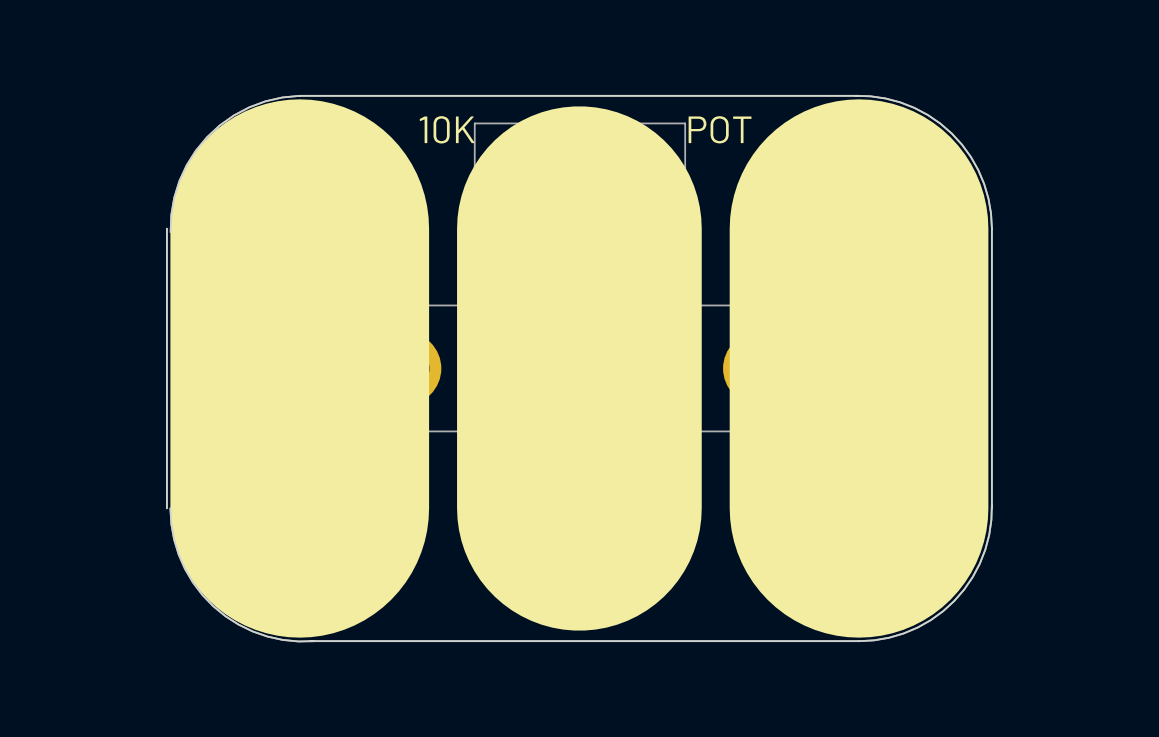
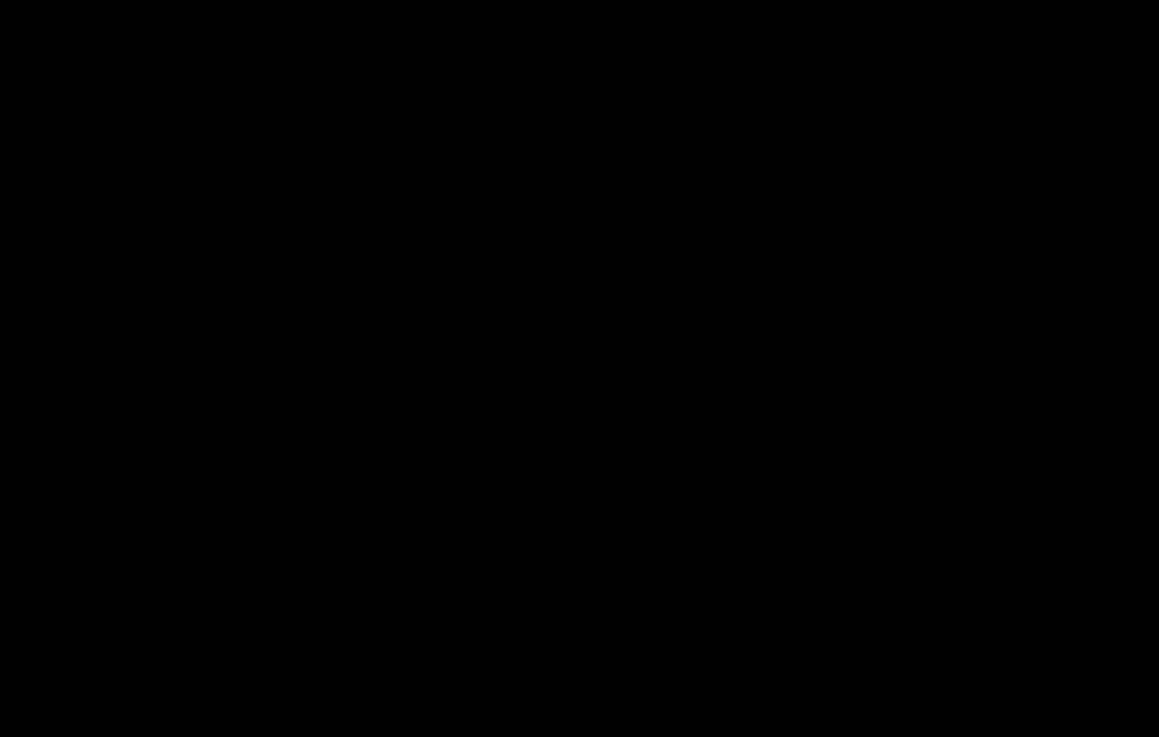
part: (579, 368) -> none

